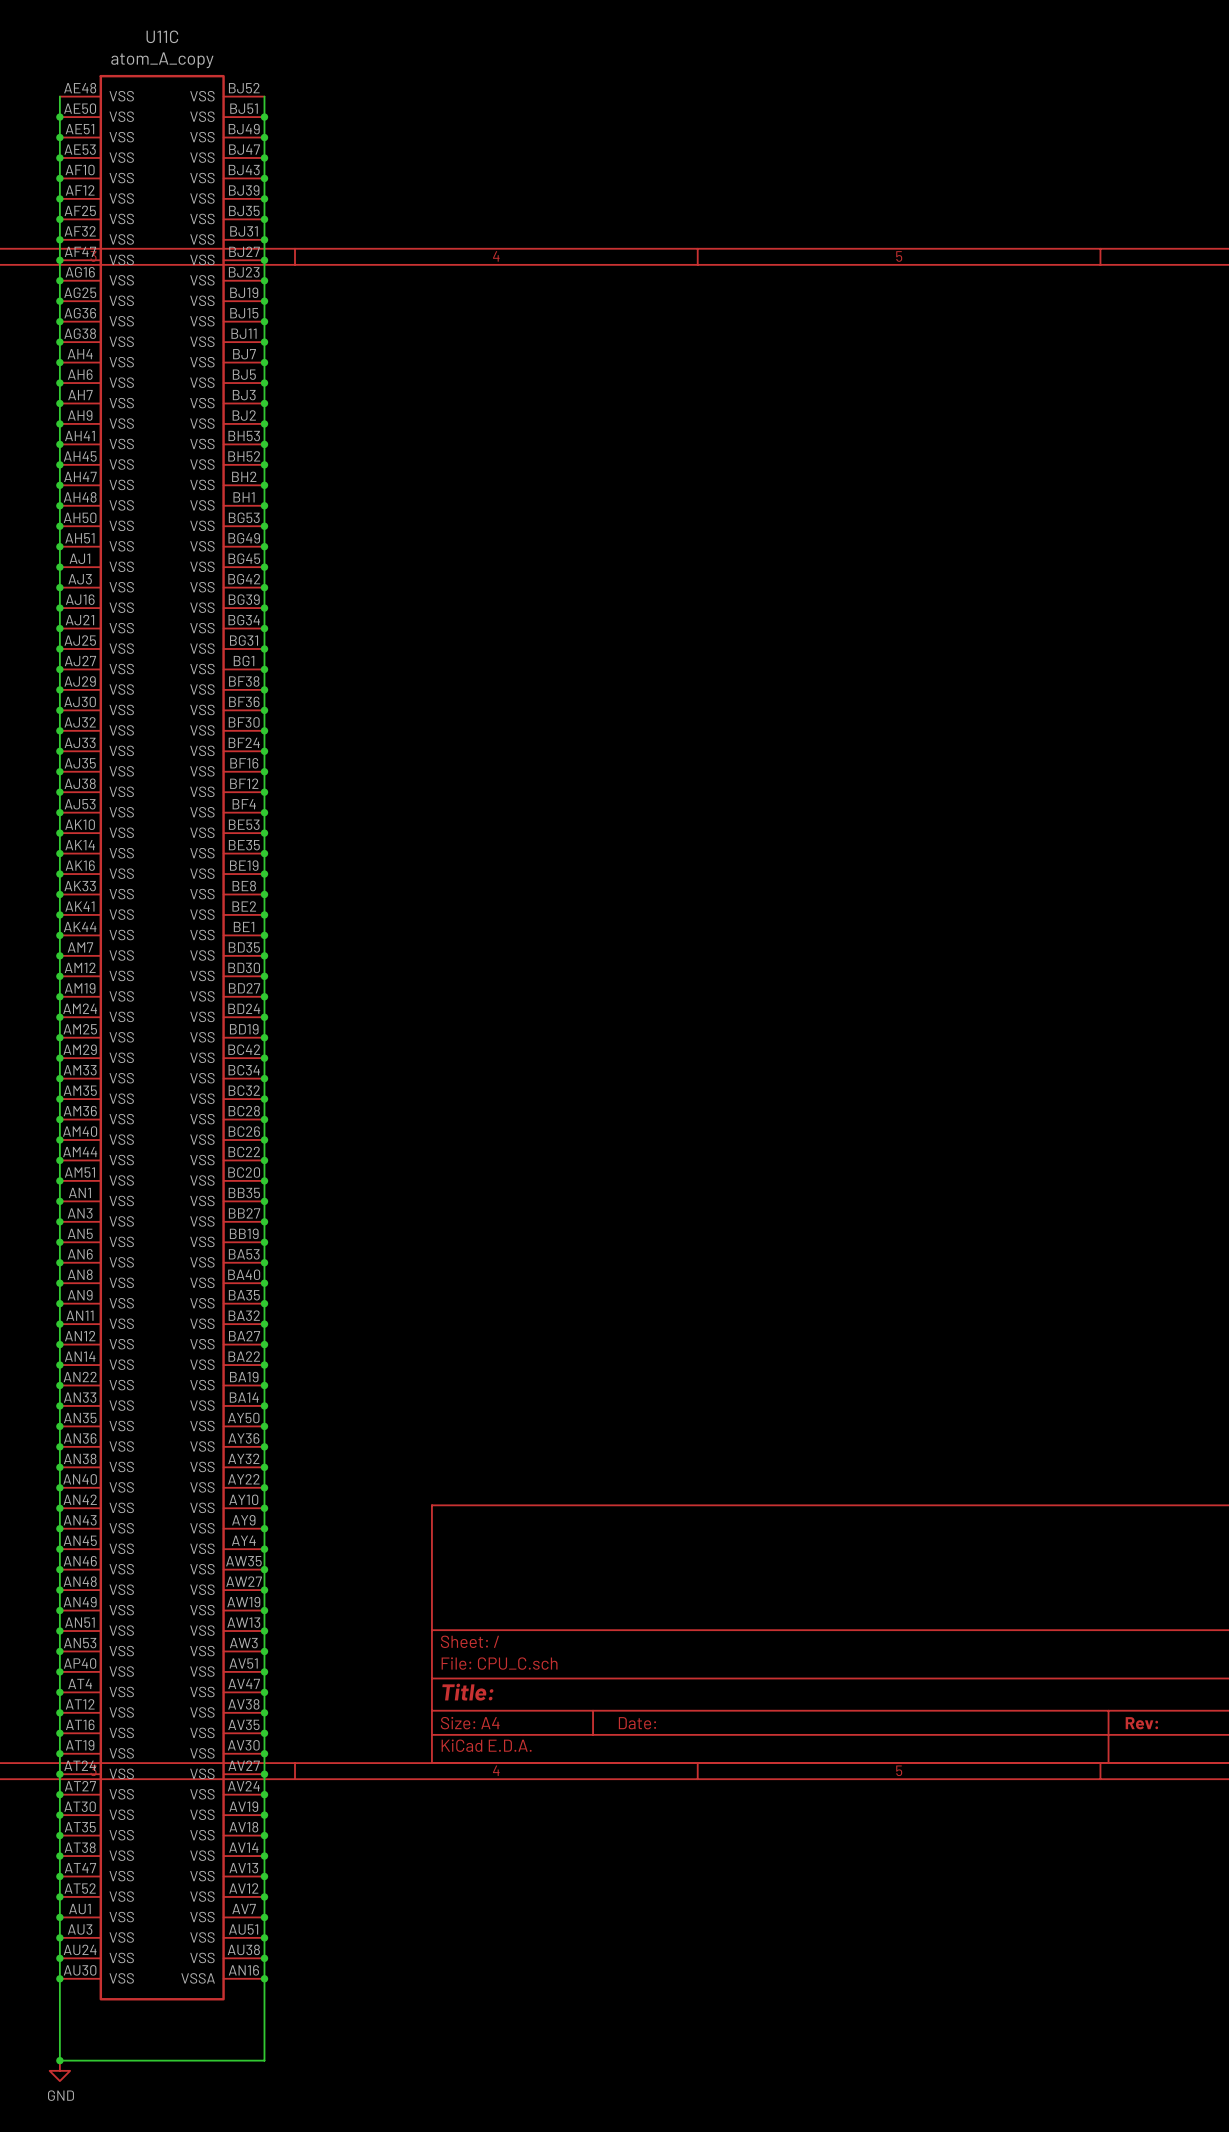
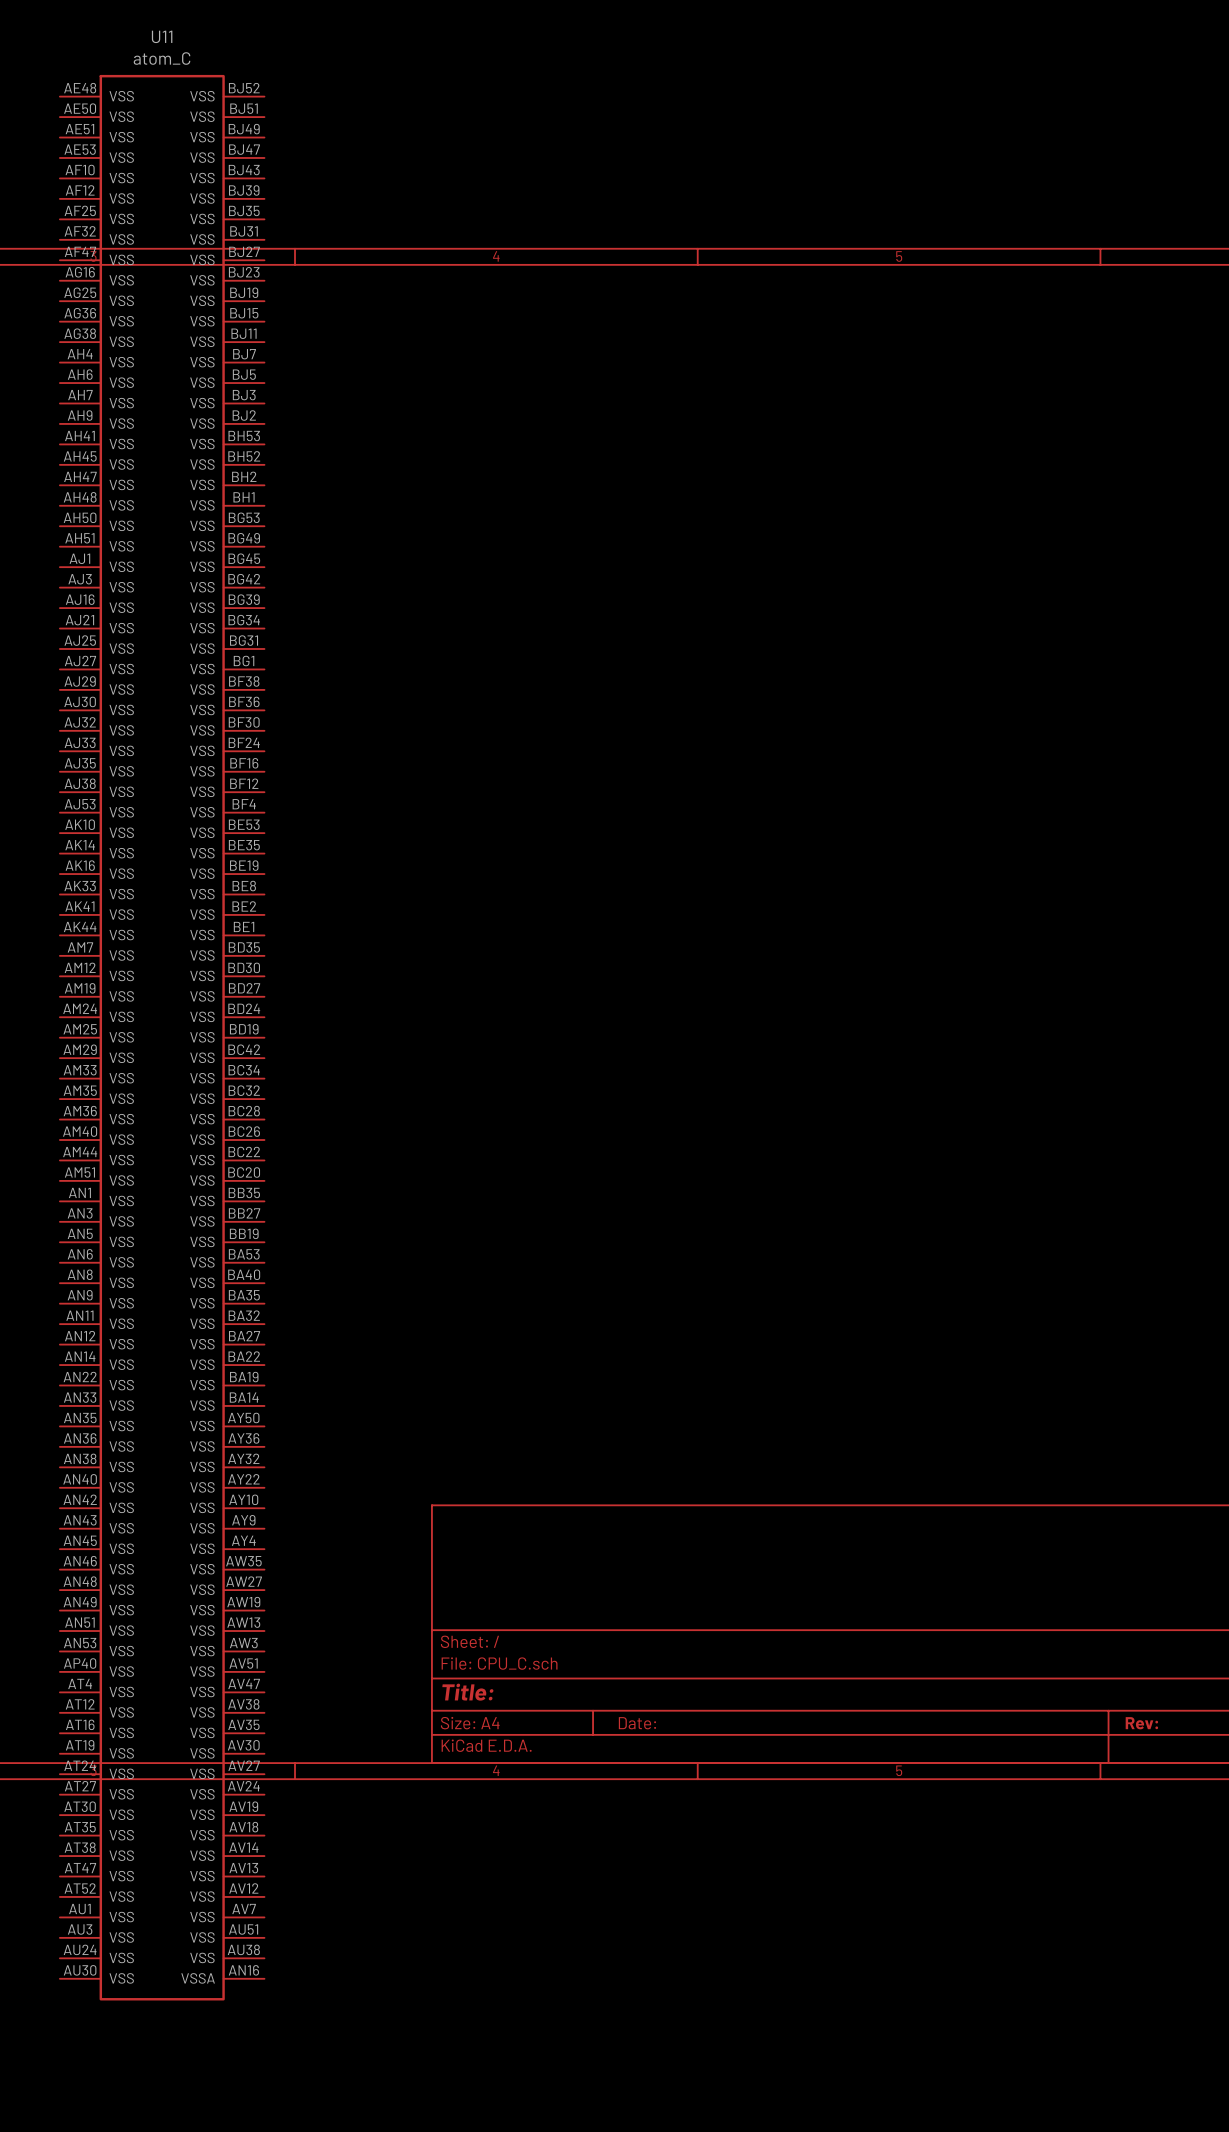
U11C name: U11C (162, 36) -> U11 (162, 36)
U11C value: atom_A_copy (162, 60) -> atom_C (162, 58)
wire: (59, 96) (59, 2060) (264, 2060) (264, 96) -> none
junction: (59, 117) -> none
junction: (264, 117) -> none
junction: (59, 137) -> none
junction: (264, 137) -> none
junction: (59, 157) -> none
junction: (264, 157) -> none
junction: (59, 178) -> none
junction: (264, 178) -> none
junction: (59, 198) -> none
junction: (264, 198) -> none
junction: (59, 219) -> none
junction: (264, 219) -> none
junction: (59, 239) -> none
junction: (264, 239) -> none
junction: (59, 260) -> none
junction: (264, 260) -> none
junction: (59, 280) -> none
junction: (264, 280) -> none
junction: (59, 301) -> none
junction: (264, 301) -> none
junction: (59, 321) -> none
junction: (264, 321) -> none
junction: (59, 342) -> none
junction: (264, 342) -> none
junction: (59, 362) -> none
junction: (264, 362) -> none
junction: (59, 383) -> none
junction: (264, 383) -> none
junction: (59, 403) -> none
junction: (264, 403) -> none
junction: (59, 423) -> none
junction: (264, 423) -> none
junction: (59, 444) -> none
junction: (264, 444) -> none
junction: (59, 464) -> none
junction: (264, 464) -> none
junction: (59, 485) -> none
junction: (264, 485) -> none
junction: (59, 505) -> none
junction: (264, 505) -> none
junction: (59, 526) -> none
junction: (264, 526) -> none
junction: (59, 546) -> none
junction: (264, 546) -> none
junction: (59, 567) -> none
junction: (264, 567) -> none
junction: (59, 587) -> none
junction: (264, 587) -> none
junction: (59, 608) -> none
junction: (264, 608) -> none
junction: (59, 628) -> none
junction: (264, 628) -> none
junction: (59, 648) -> none
junction: (264, 648) -> none
junction: (59, 669) -> none
junction: (264, 669) -> none
junction: (59, 689) -> none
junction: (264, 689) -> none
junction: (59, 710) -> none
junction: (264, 710) -> none
junction: (59, 730) -> none
junction: (264, 730) -> none
junction: (59, 751) -> none
junction: (264, 751) -> none
junction: (59, 771) -> none
junction: (264, 771) -> none
junction: (59, 792) -> none
junction: (264, 792) -> none
junction: (59, 812) -> none
junction: (264, 812) -> none
junction: (59, 833) -> none
junction: (264, 833) -> none
junction: (59, 853) -> none
junction: (264, 853) -> none
junction: (59, 874) -> none
junction: (264, 874) -> none
junction: (59, 894) -> none
junction: (264, 894) -> none
junction: (59, 914) -> none
junction: (264, 914) -> none
junction: (59, 935) -> none
junction: (264, 935) -> none
junction: (59, 955) -> none
junction: (264, 955) -> none
junction: (59, 976) -> none
junction: (264, 976) -> none
junction: (59, 996) -> none
junction: (264, 996) -> none
junction: (59, 1017) -> none
junction: (264, 1017) -> none
junction: (59, 1037) -> none
junction: (264, 1037) -> none
junction: (59, 1058) -> none
junction: (264, 1058) -> none
junction: (59, 1078) -> none
junction: (264, 1078) -> none
junction: (59, 1099) -> none
junction: (264, 1099) -> none
junction: (59, 1119) -> none
junction: (264, 1119) -> none
junction: (59, 1140) -> none
junction: (264, 1140) -> none
junction: (59, 1160) -> none
junction: (264, 1160) -> none
junction: (59, 1180) -> none
junction: (264, 1180) -> none
junction: (59, 1201) -> none
junction: (264, 1201) -> none
junction: (59, 1221) -> none
junction: (264, 1221) -> none
junction: (59, 1242) -> none
junction: (264, 1242) -> none
junction: (59, 1262) -> none
junction: (264, 1262) -> none
junction: (59, 1283) -> none
junction: (264, 1283) -> none
junction: (59, 1303) -> none
junction: (264, 1303) -> none
junction: (59, 1324) -> none
junction: (264, 1324) -> none
junction: (59, 1344) -> none
junction: (264, 1344) -> none
junction: (59, 1365) -> none
junction: (264, 1365) -> none
junction: (59, 1385) -> none
junction: (264, 1385) -> none
junction: (59, 1405) -> none
junction: (264, 1405) -> none
junction: (59, 1426) -> none
junction: (264, 1426) -> none
junction: (59, 1446) -> none
junction: (264, 1446) -> none
junction: (59, 1467) -> none
junction: (264, 1467) -> none
junction: (59, 1487) -> none
junction: (264, 1487) -> none
junction: (59, 1508) -> none
junction: (264, 1508) -> none
junction: (59, 1528) -> none
junction: (264, 1528) -> none
junction: (59, 1549) -> none
junction: (264, 1549) -> none
junction: (59, 1569) -> none
junction: (264, 1569) -> none
junction: (59, 1590) -> none
junction: (264, 1590) -> none
junction: (59, 1610) -> none
junction: (264, 1610) -> none
junction: (59, 1631) -> none
junction: (264, 1631) -> none
junction: (59, 1651) -> none
junction: (264, 1651) -> none
junction: (59, 1671) -> none
junction: (264, 1671) -> none
junction: (59, 1692) -> none
junction: (264, 1692) -> none
junction: (59, 1712) -> none
junction: (264, 1712) -> none
junction: (59, 1733) -> none
junction: (264, 1733) -> none
junction: (59, 1753) -> none
junction: (264, 1753) -> none
junction: (59, 1774) -> none
junction: (264, 1774) -> none
junction: (59, 1794) -> none
junction: (264, 1794) -> none
junction: (59, 1815) -> none
junction: (264, 1815) -> none
junction: (59, 1835) -> none
junction: (264, 1835) -> none
junction: (59, 1856) -> none
junction: (264, 1856) -> none
junction: (59, 1876) -> none
junction: (264, 1876) -> none
junction: (59, 1896) -> none
junction: (264, 1896) -> none
junction: (59, 1917) -> none
junction: (264, 1917) -> none
junction: (59, 1937) -> none
junction: (264, 1937) -> none
junction: (59, 1958) -> none
junction: (264, 1958) -> none
junction: (59, 1978) -> none
junction: (264, 1978) -> none
junction: (59, 2060) -> none
power symbol: GND (59, 2070) -> none

